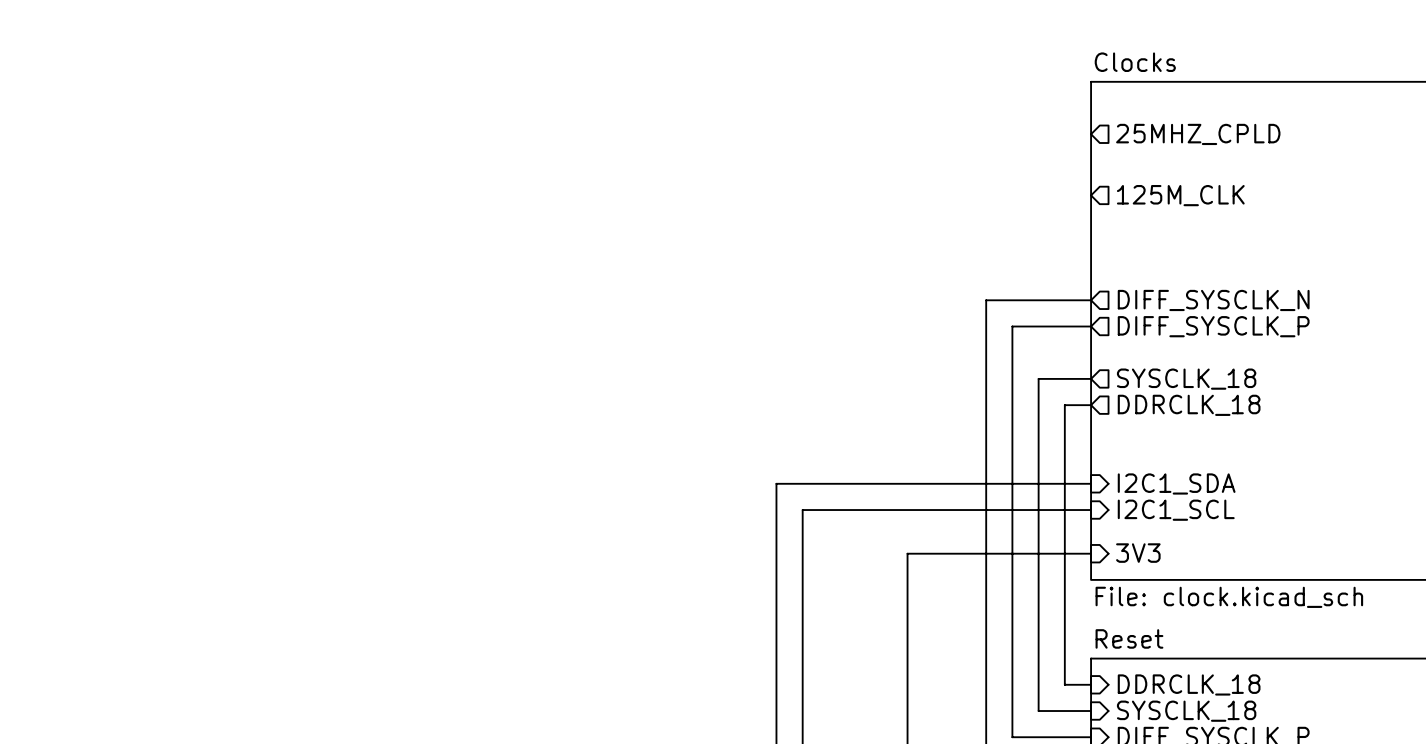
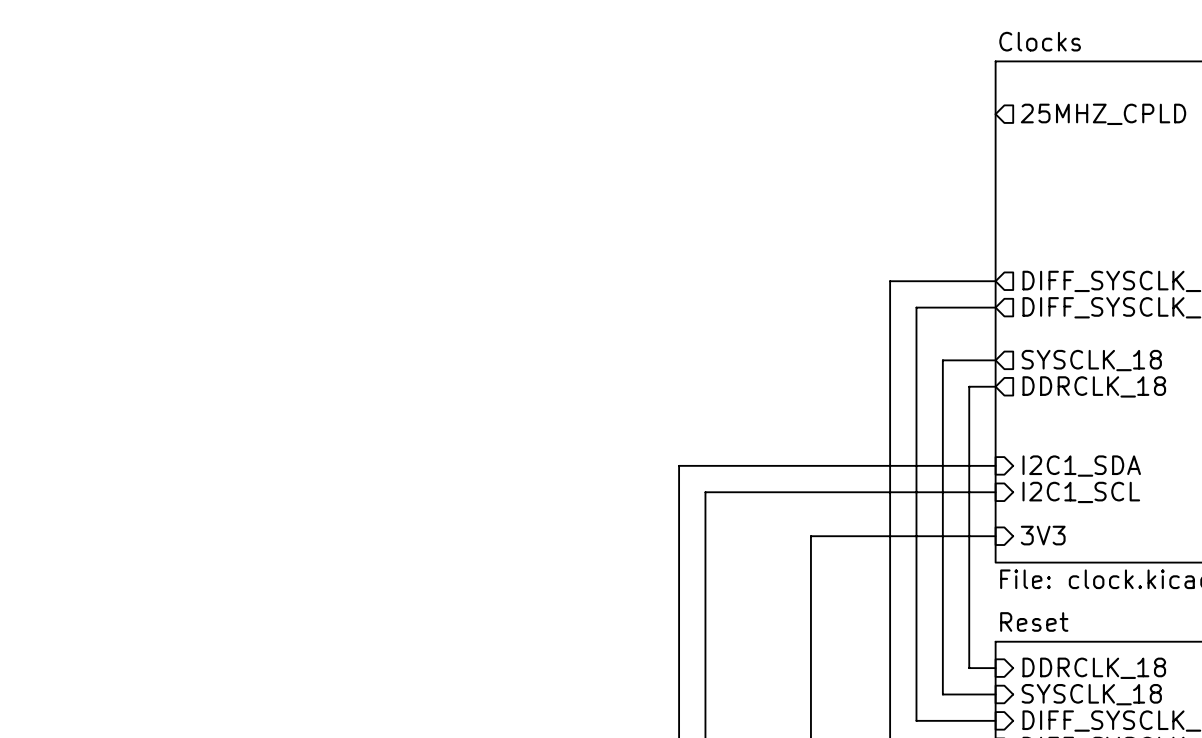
sheet pin: 125M_CLK (1180, 195) -> none

